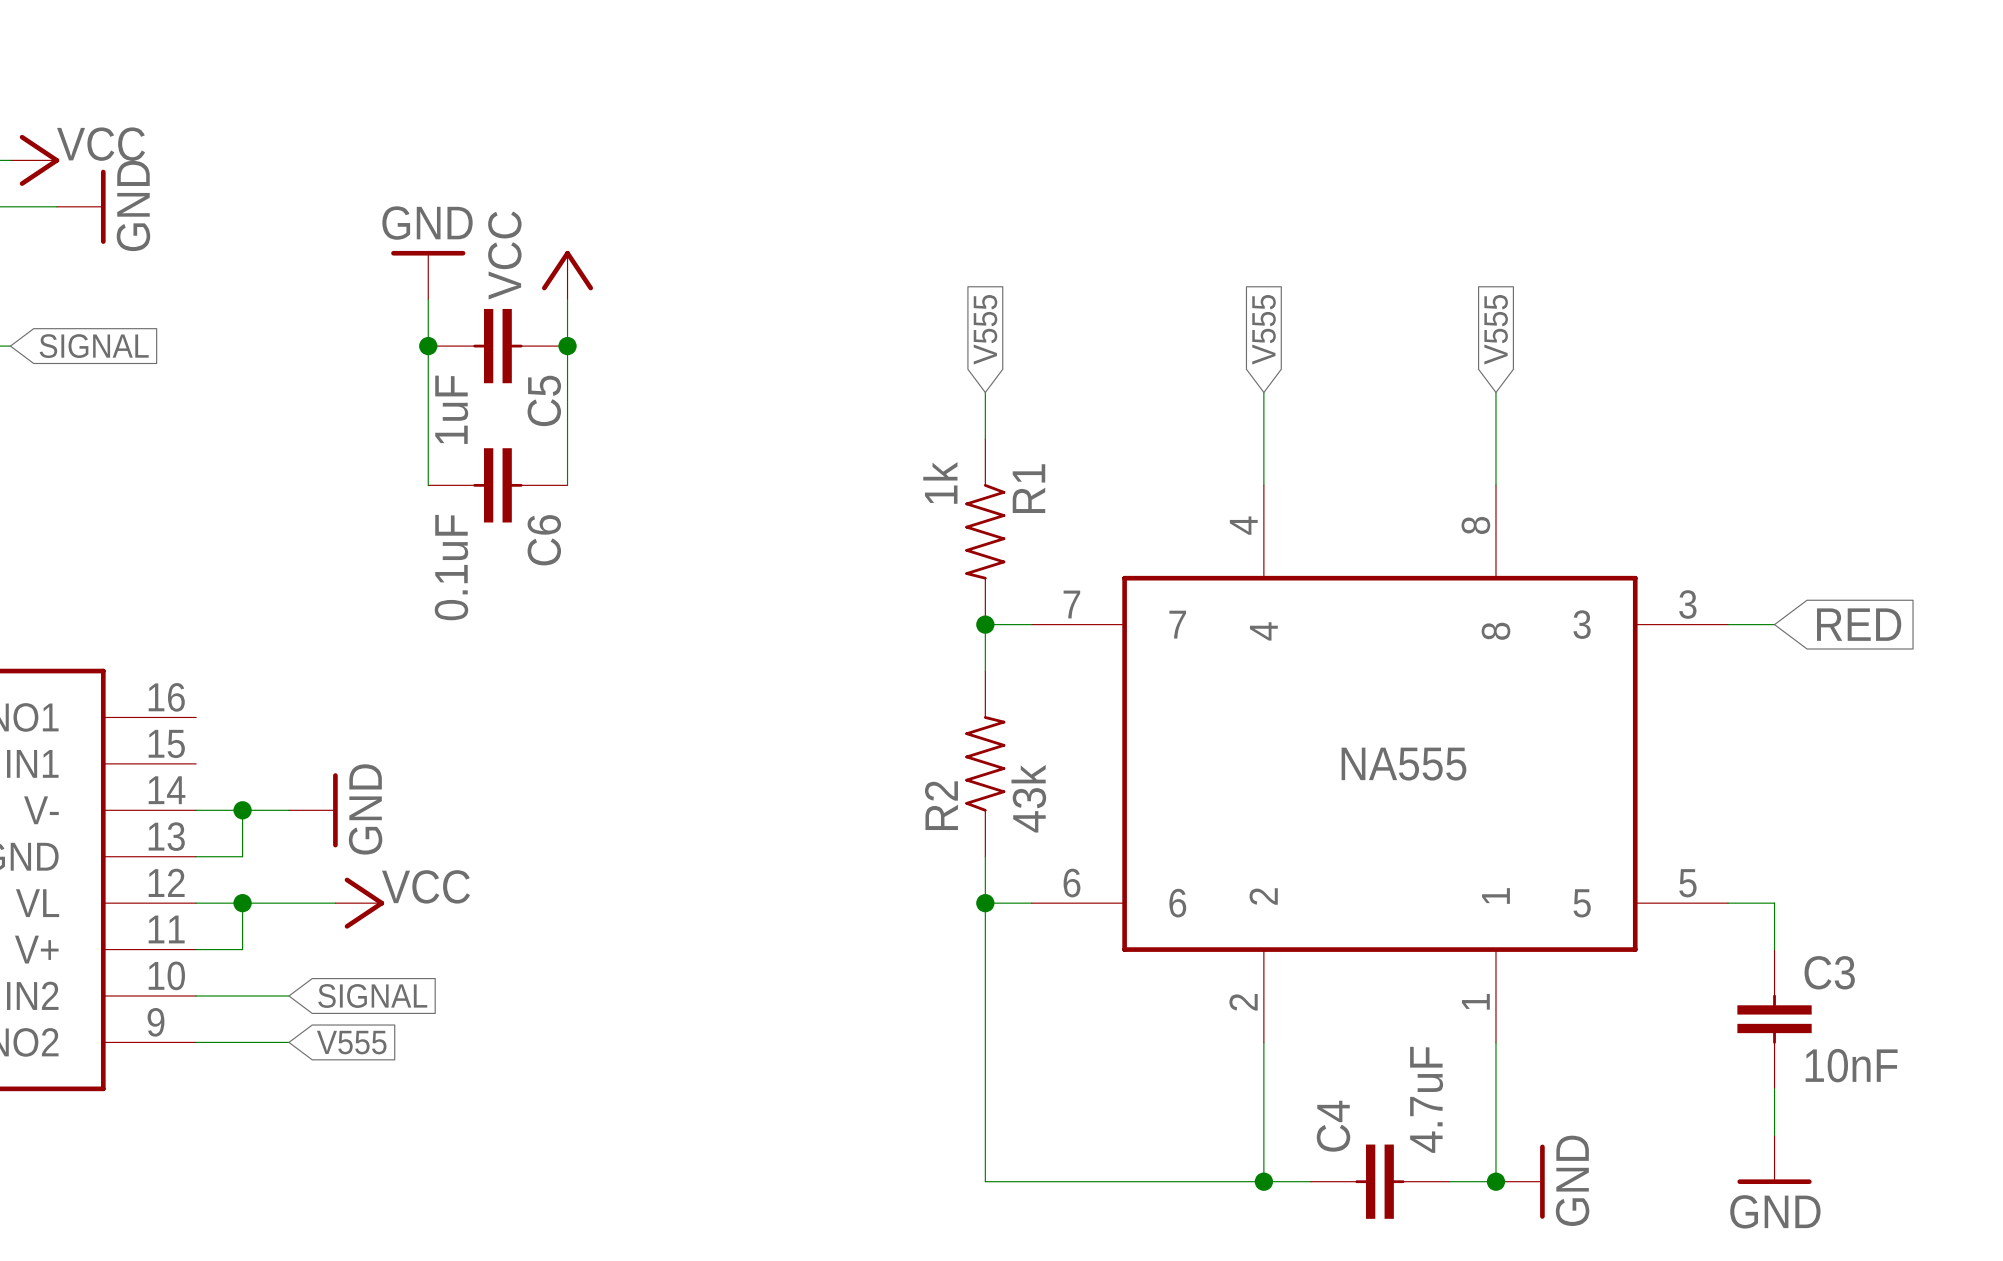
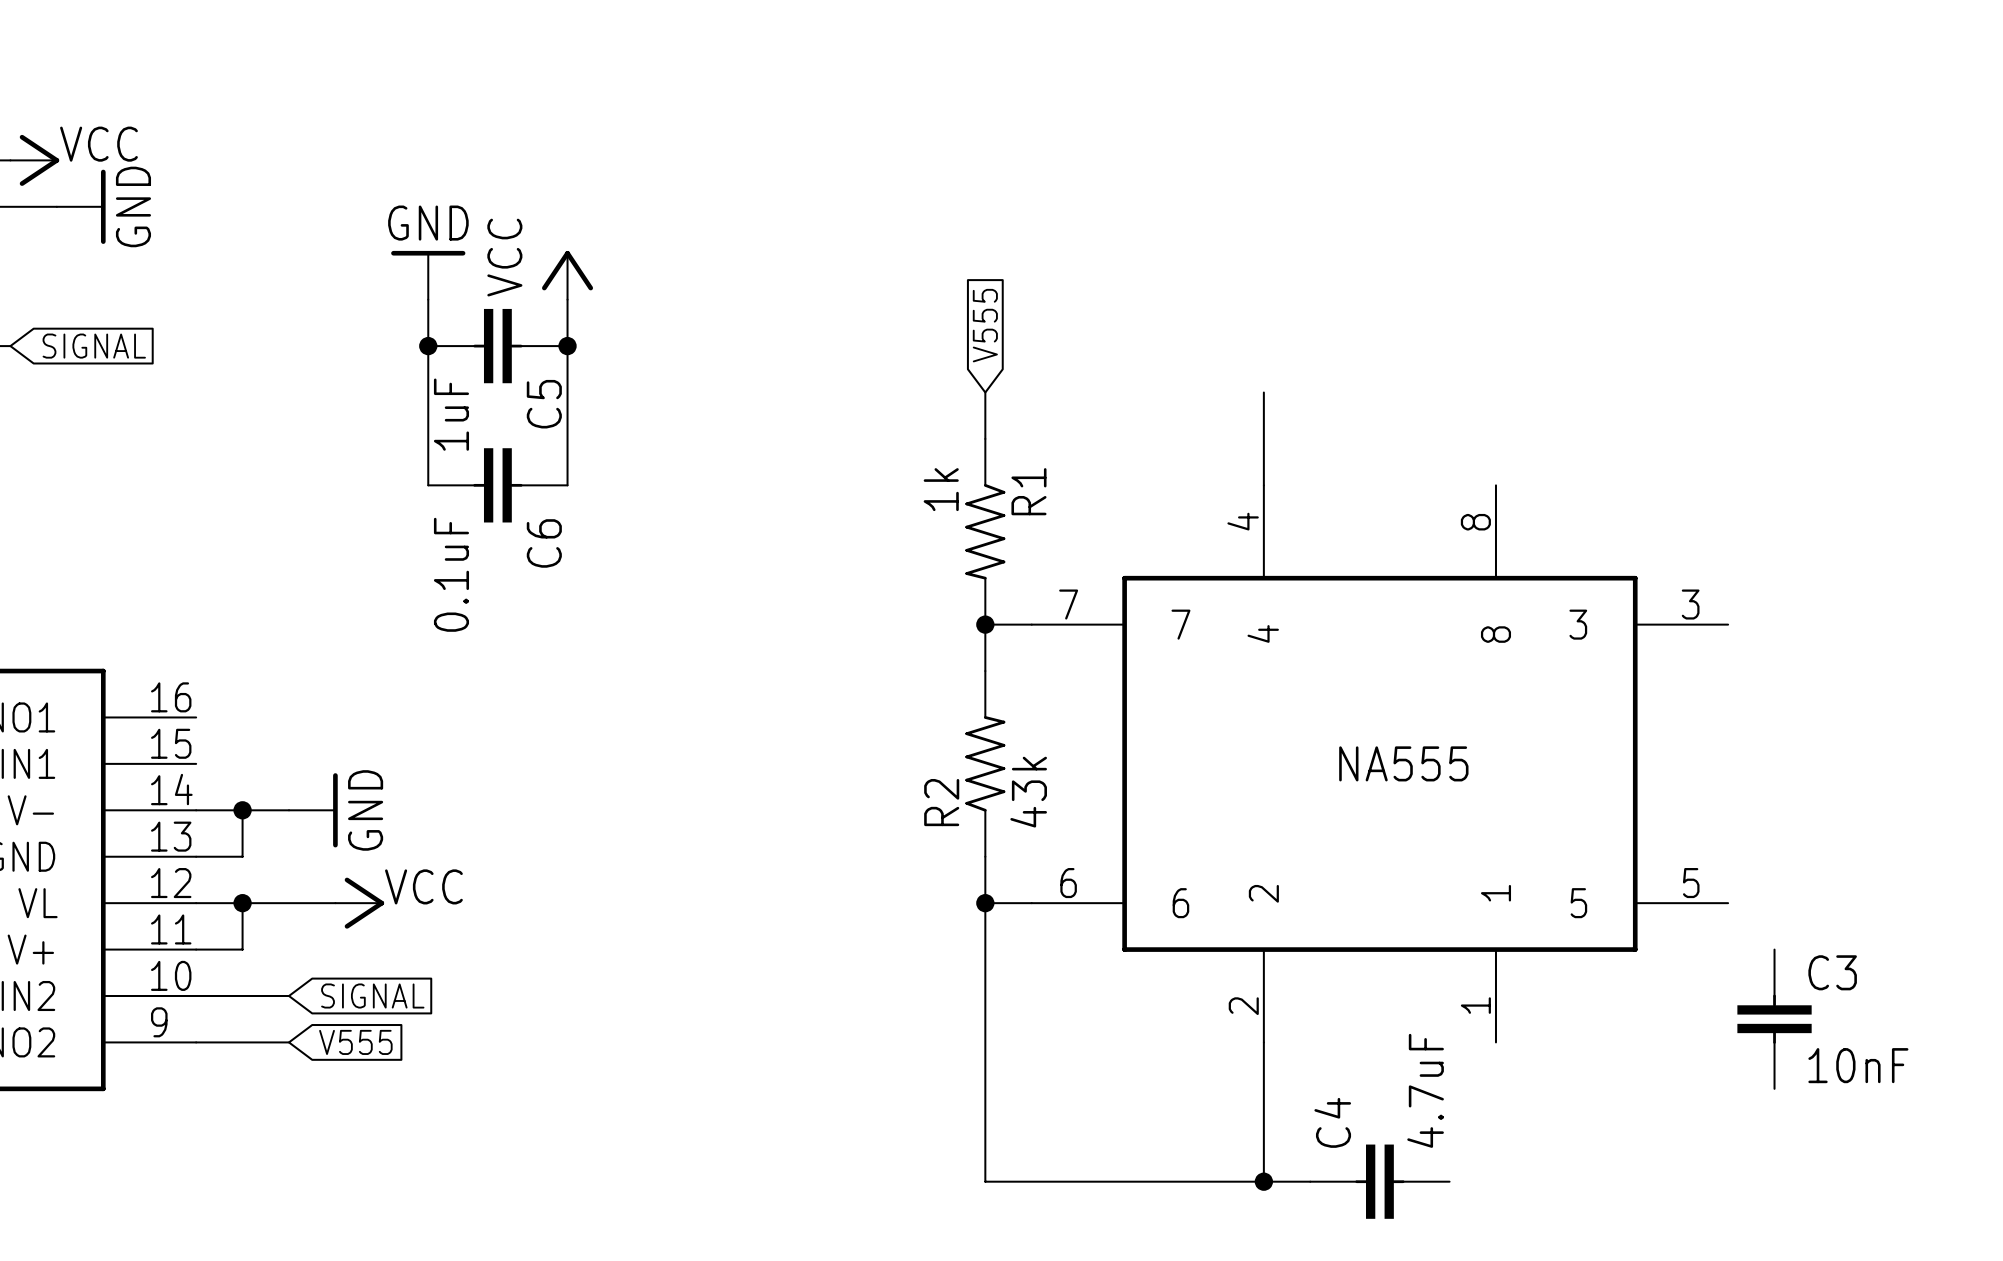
global label: V555 (1264, 329) -> none
global label: V555 (1496, 329) -> none
wire: (1495, 392) (1495, 485) -> none
wire: (1728, 624) (1774, 624) -> none
global label: RED (1859, 624) -> none
wire: (1728, 903) (1774, 903) (1774, 949) -> none
wire: (1495, 1042) (1495, 1181) (1449, 1181) -> none
wire: (1774, 1088) (1774, 1135) -> none
power symbol: GND (1774, 1159) -> none
junction: (1495, 1181) -> none
power symbol: GND (1520, 1181) -> none

